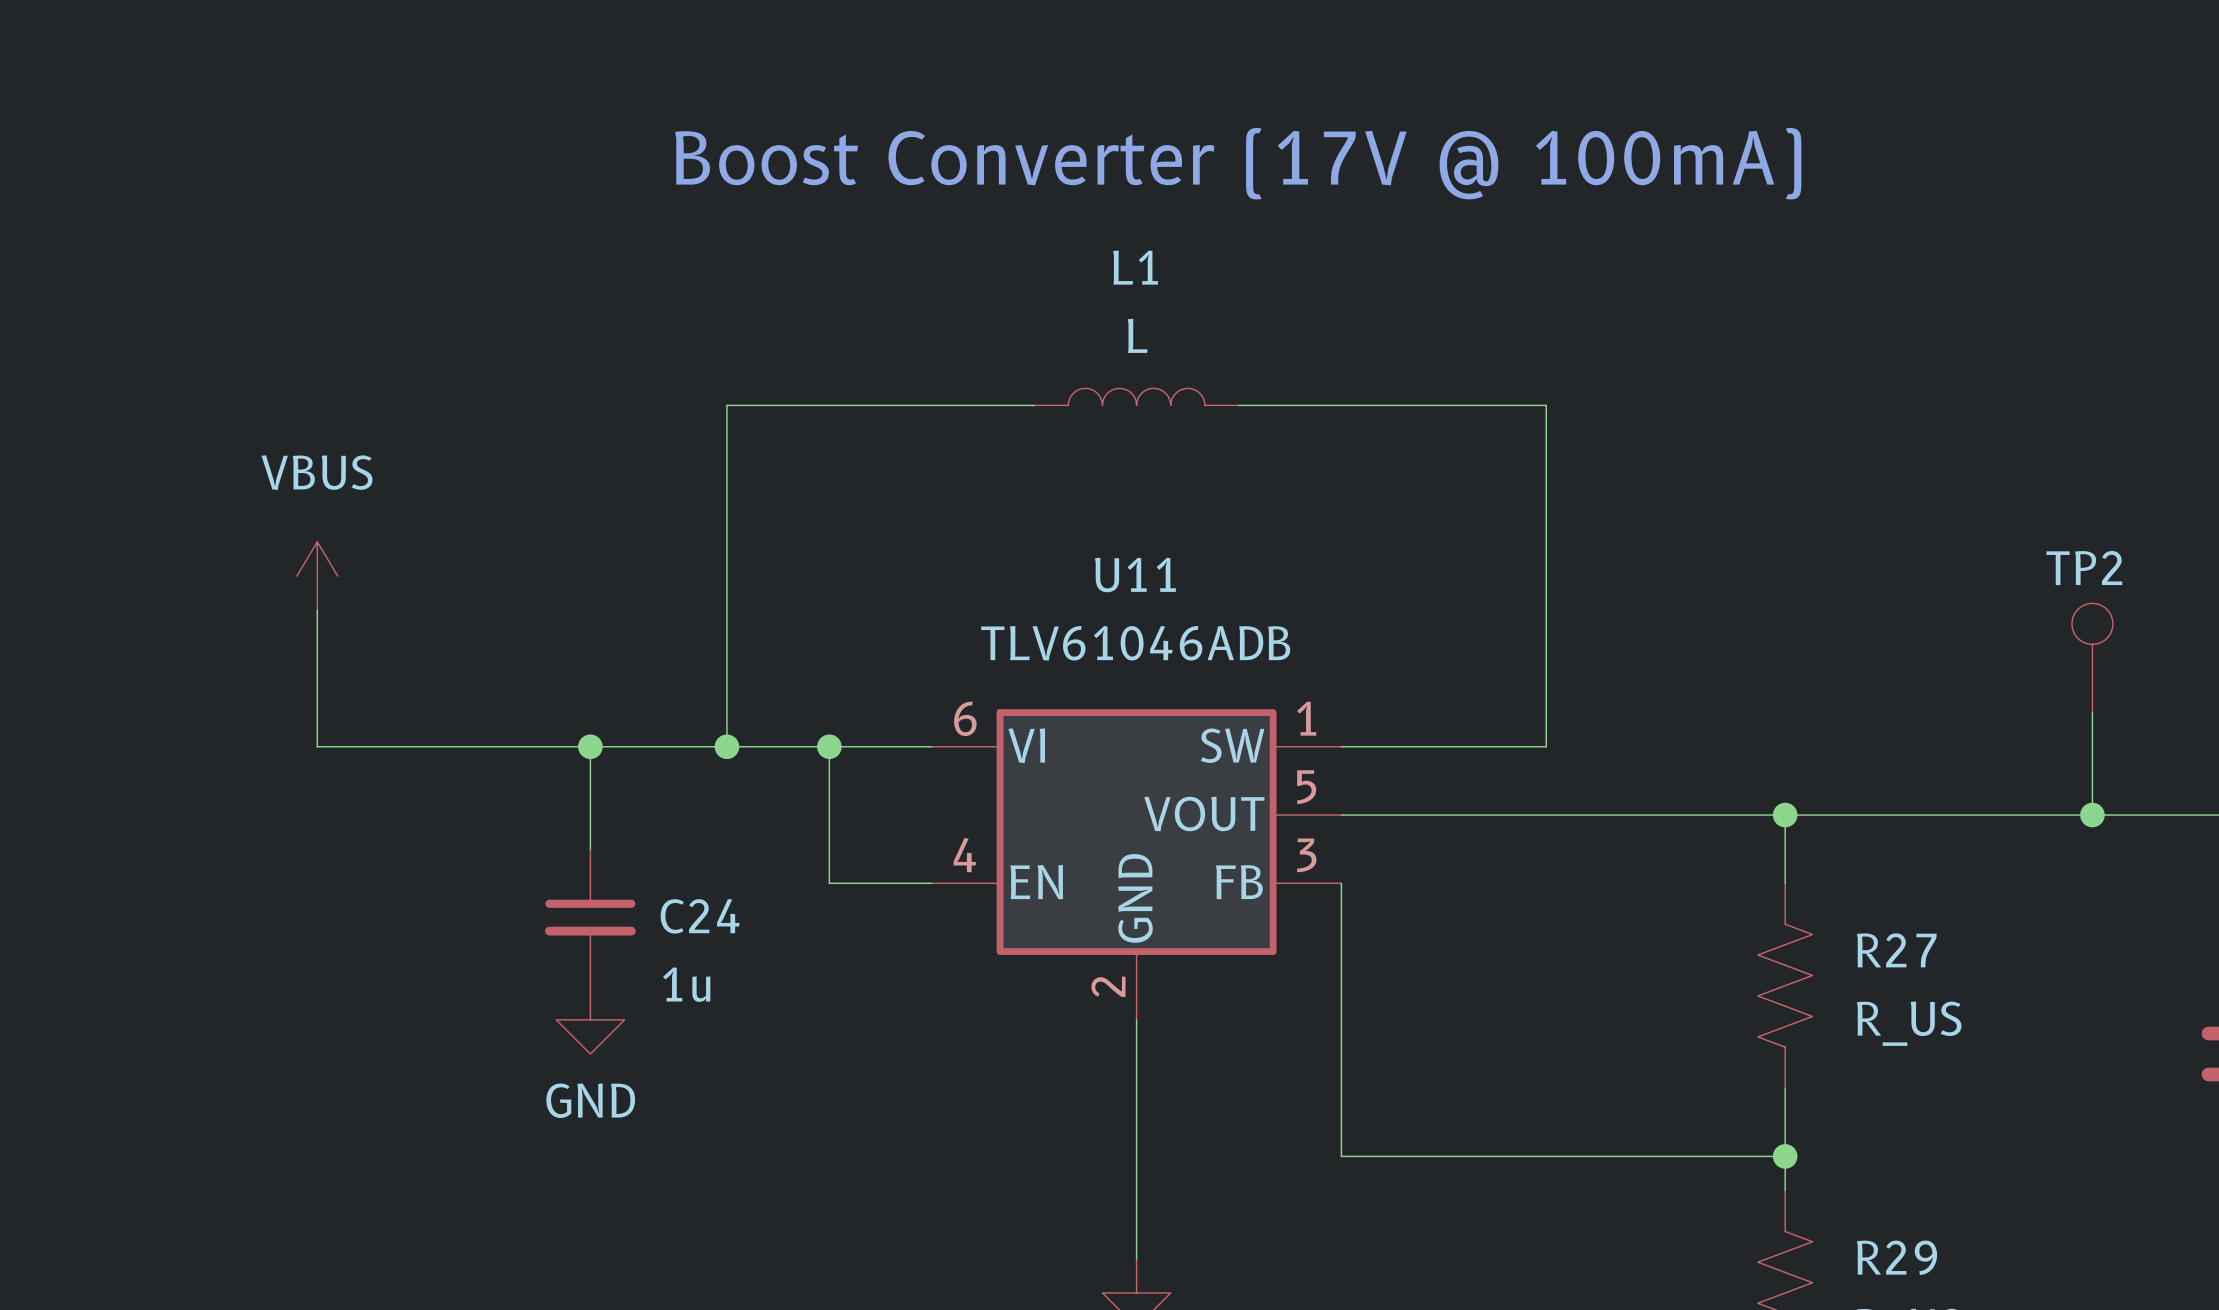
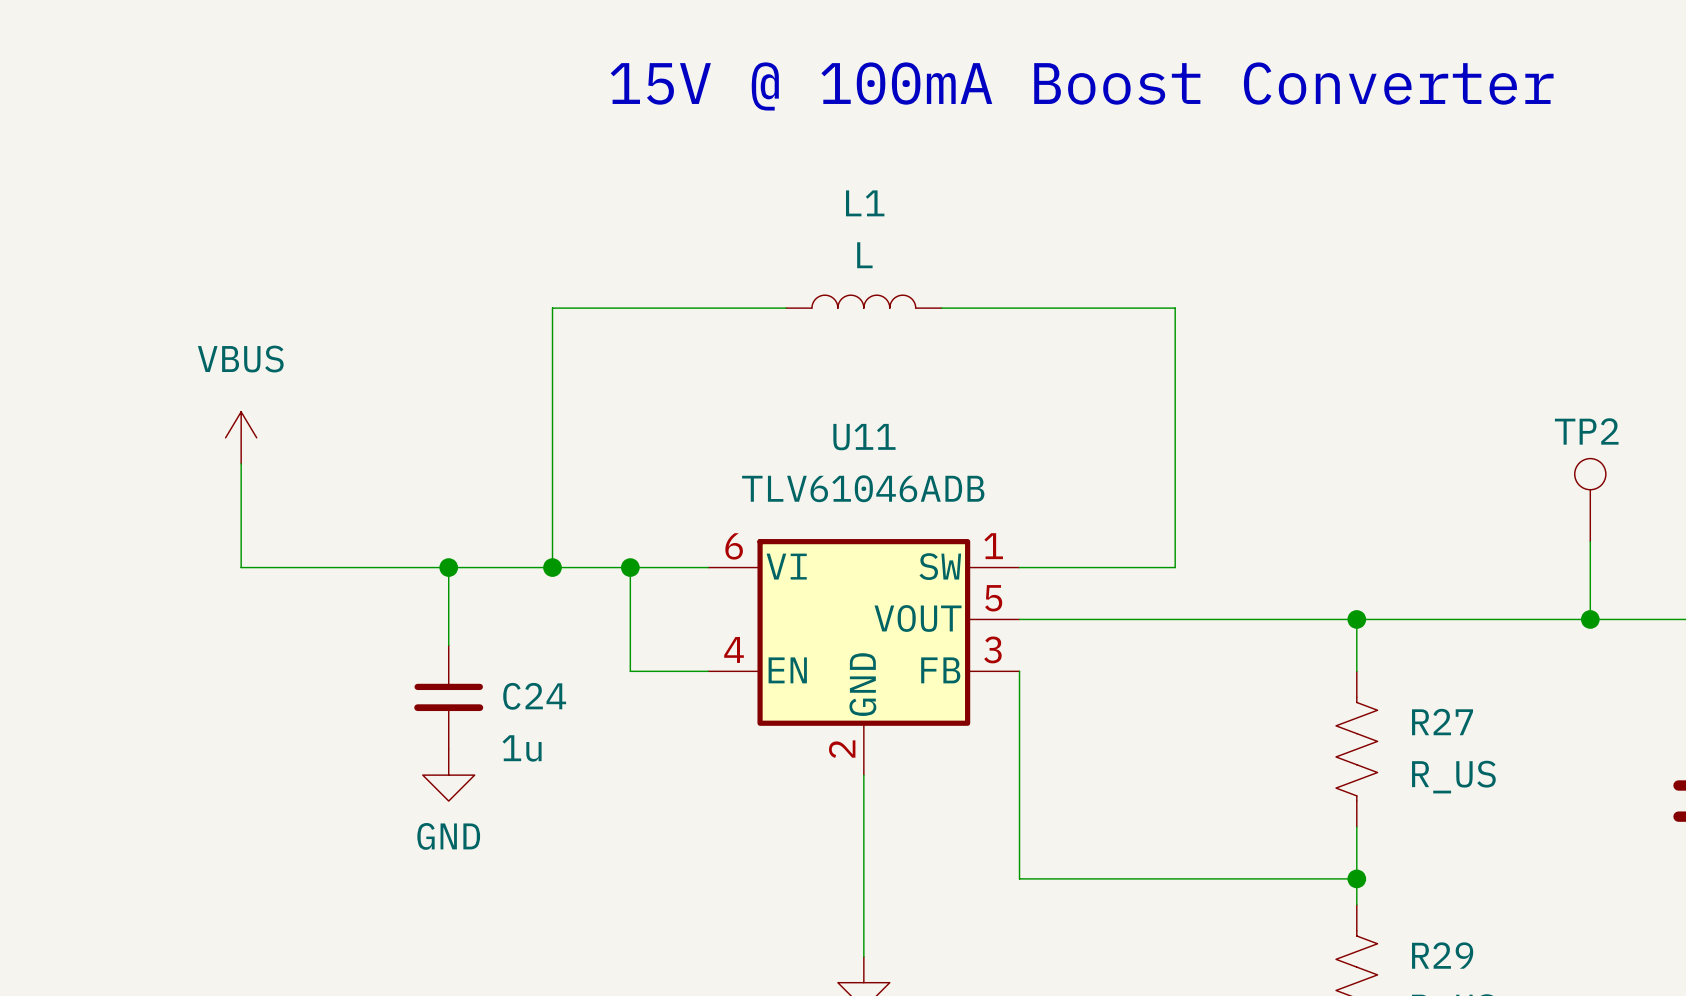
text: none -> 15V @ 100mA Boost Converter (1082, 86)
text: Boost Converter (17V @ 100mA) (1238, 163) -> none

